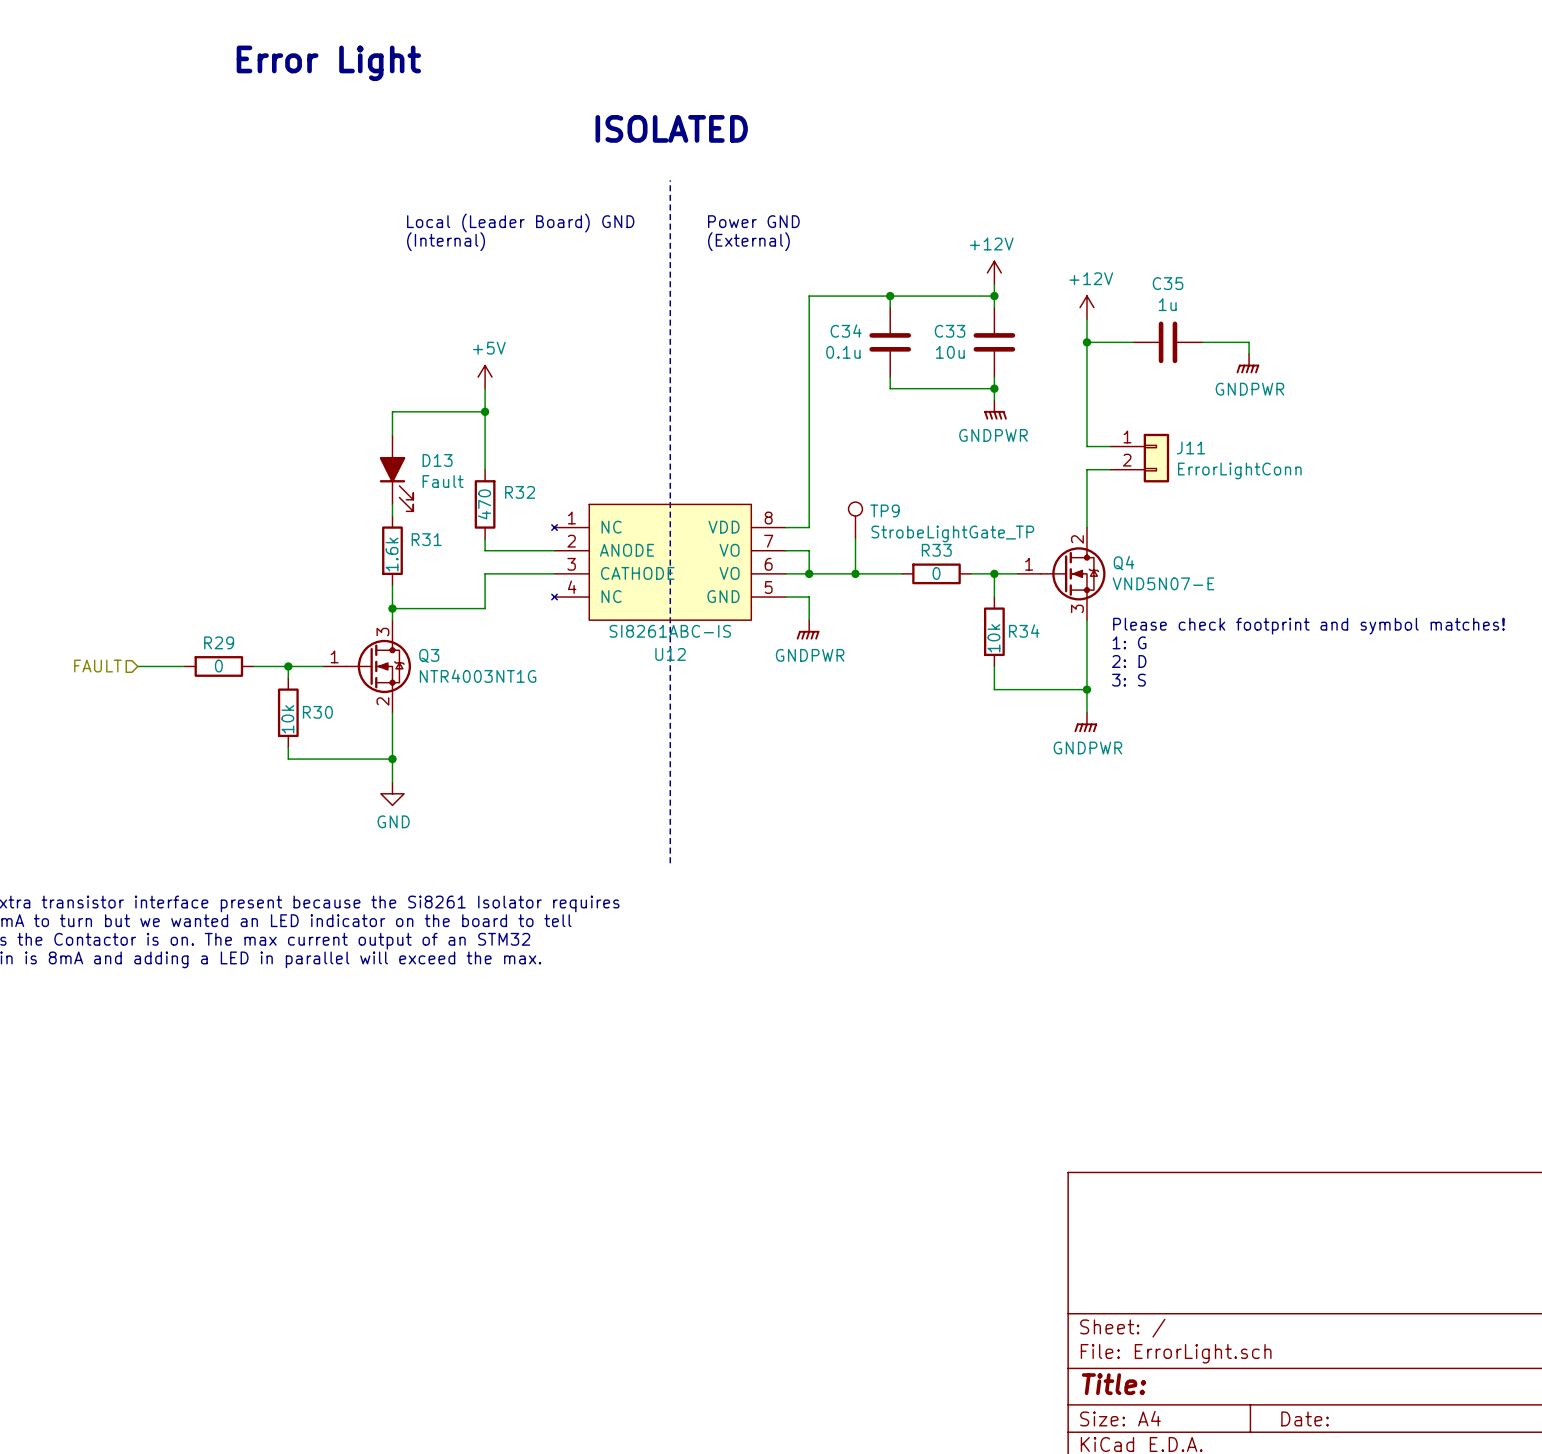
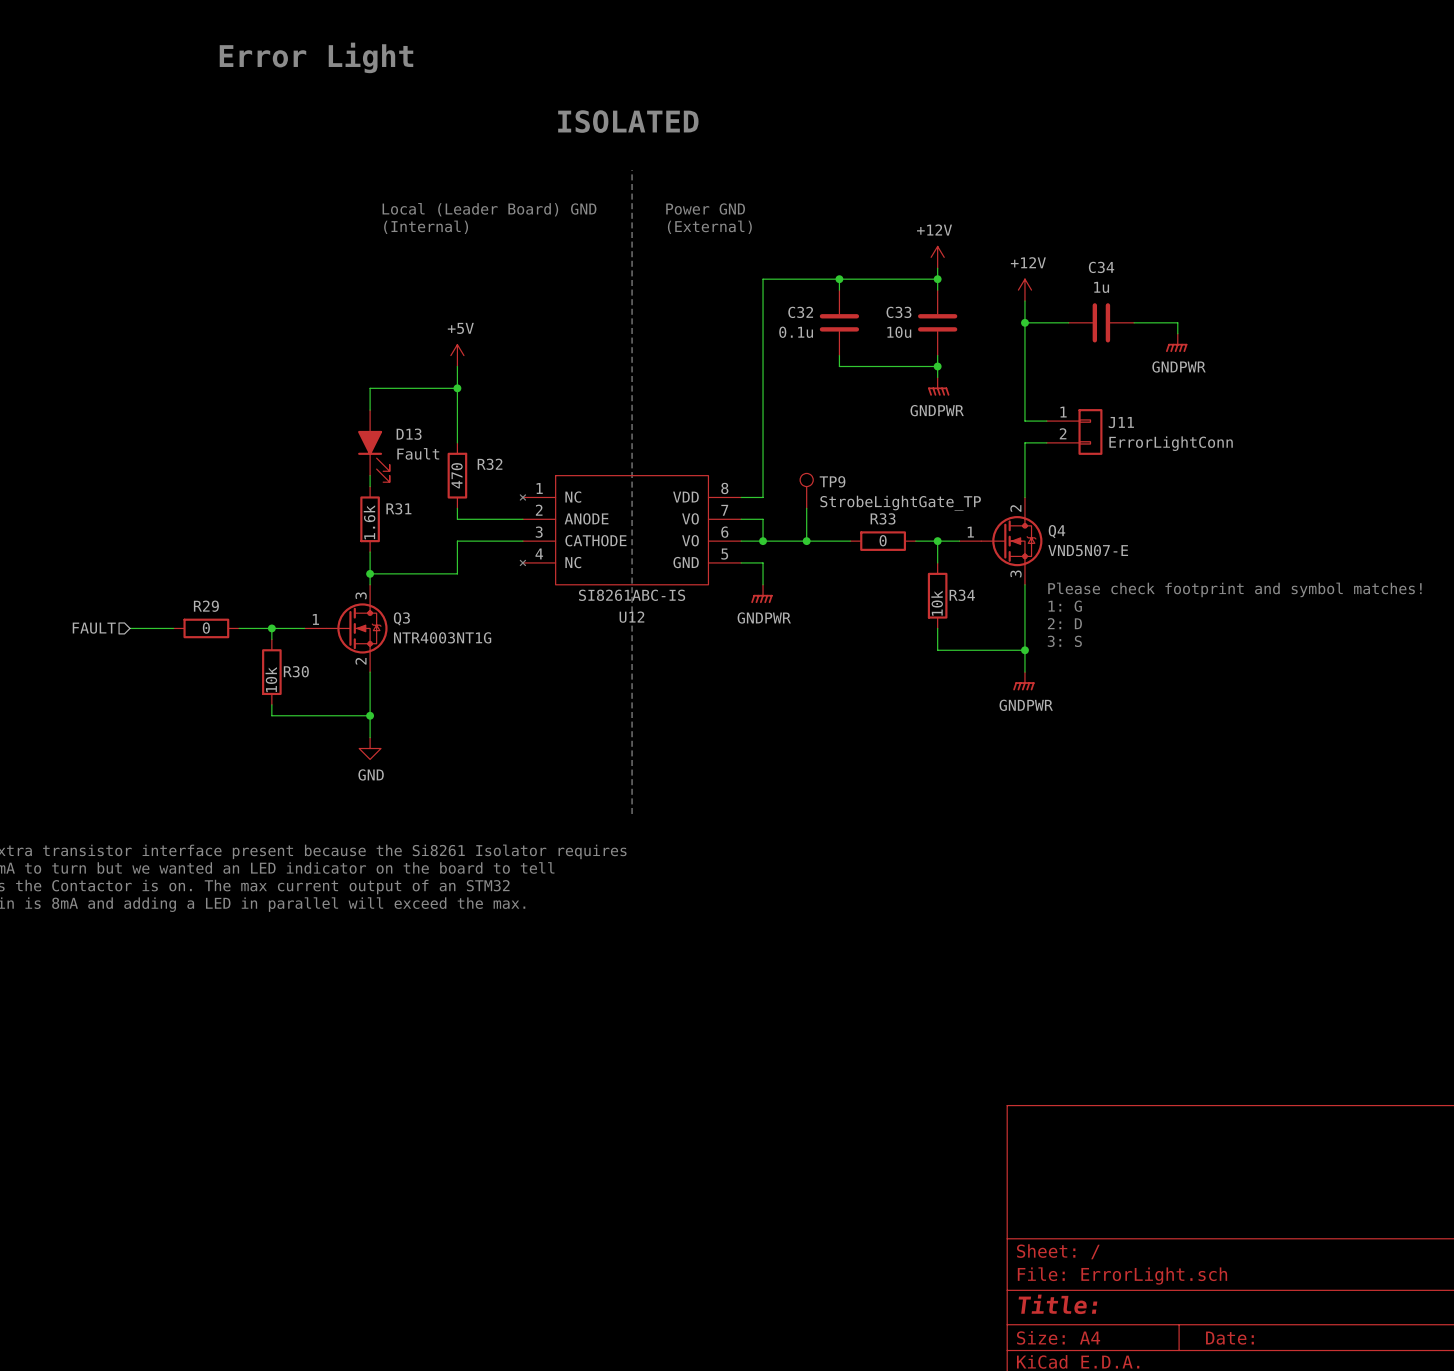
C35 name: C35 (1168, 283) -> C34 (1101, 267)
C34 name: C34 (846, 331) -> C32 (800, 312)

